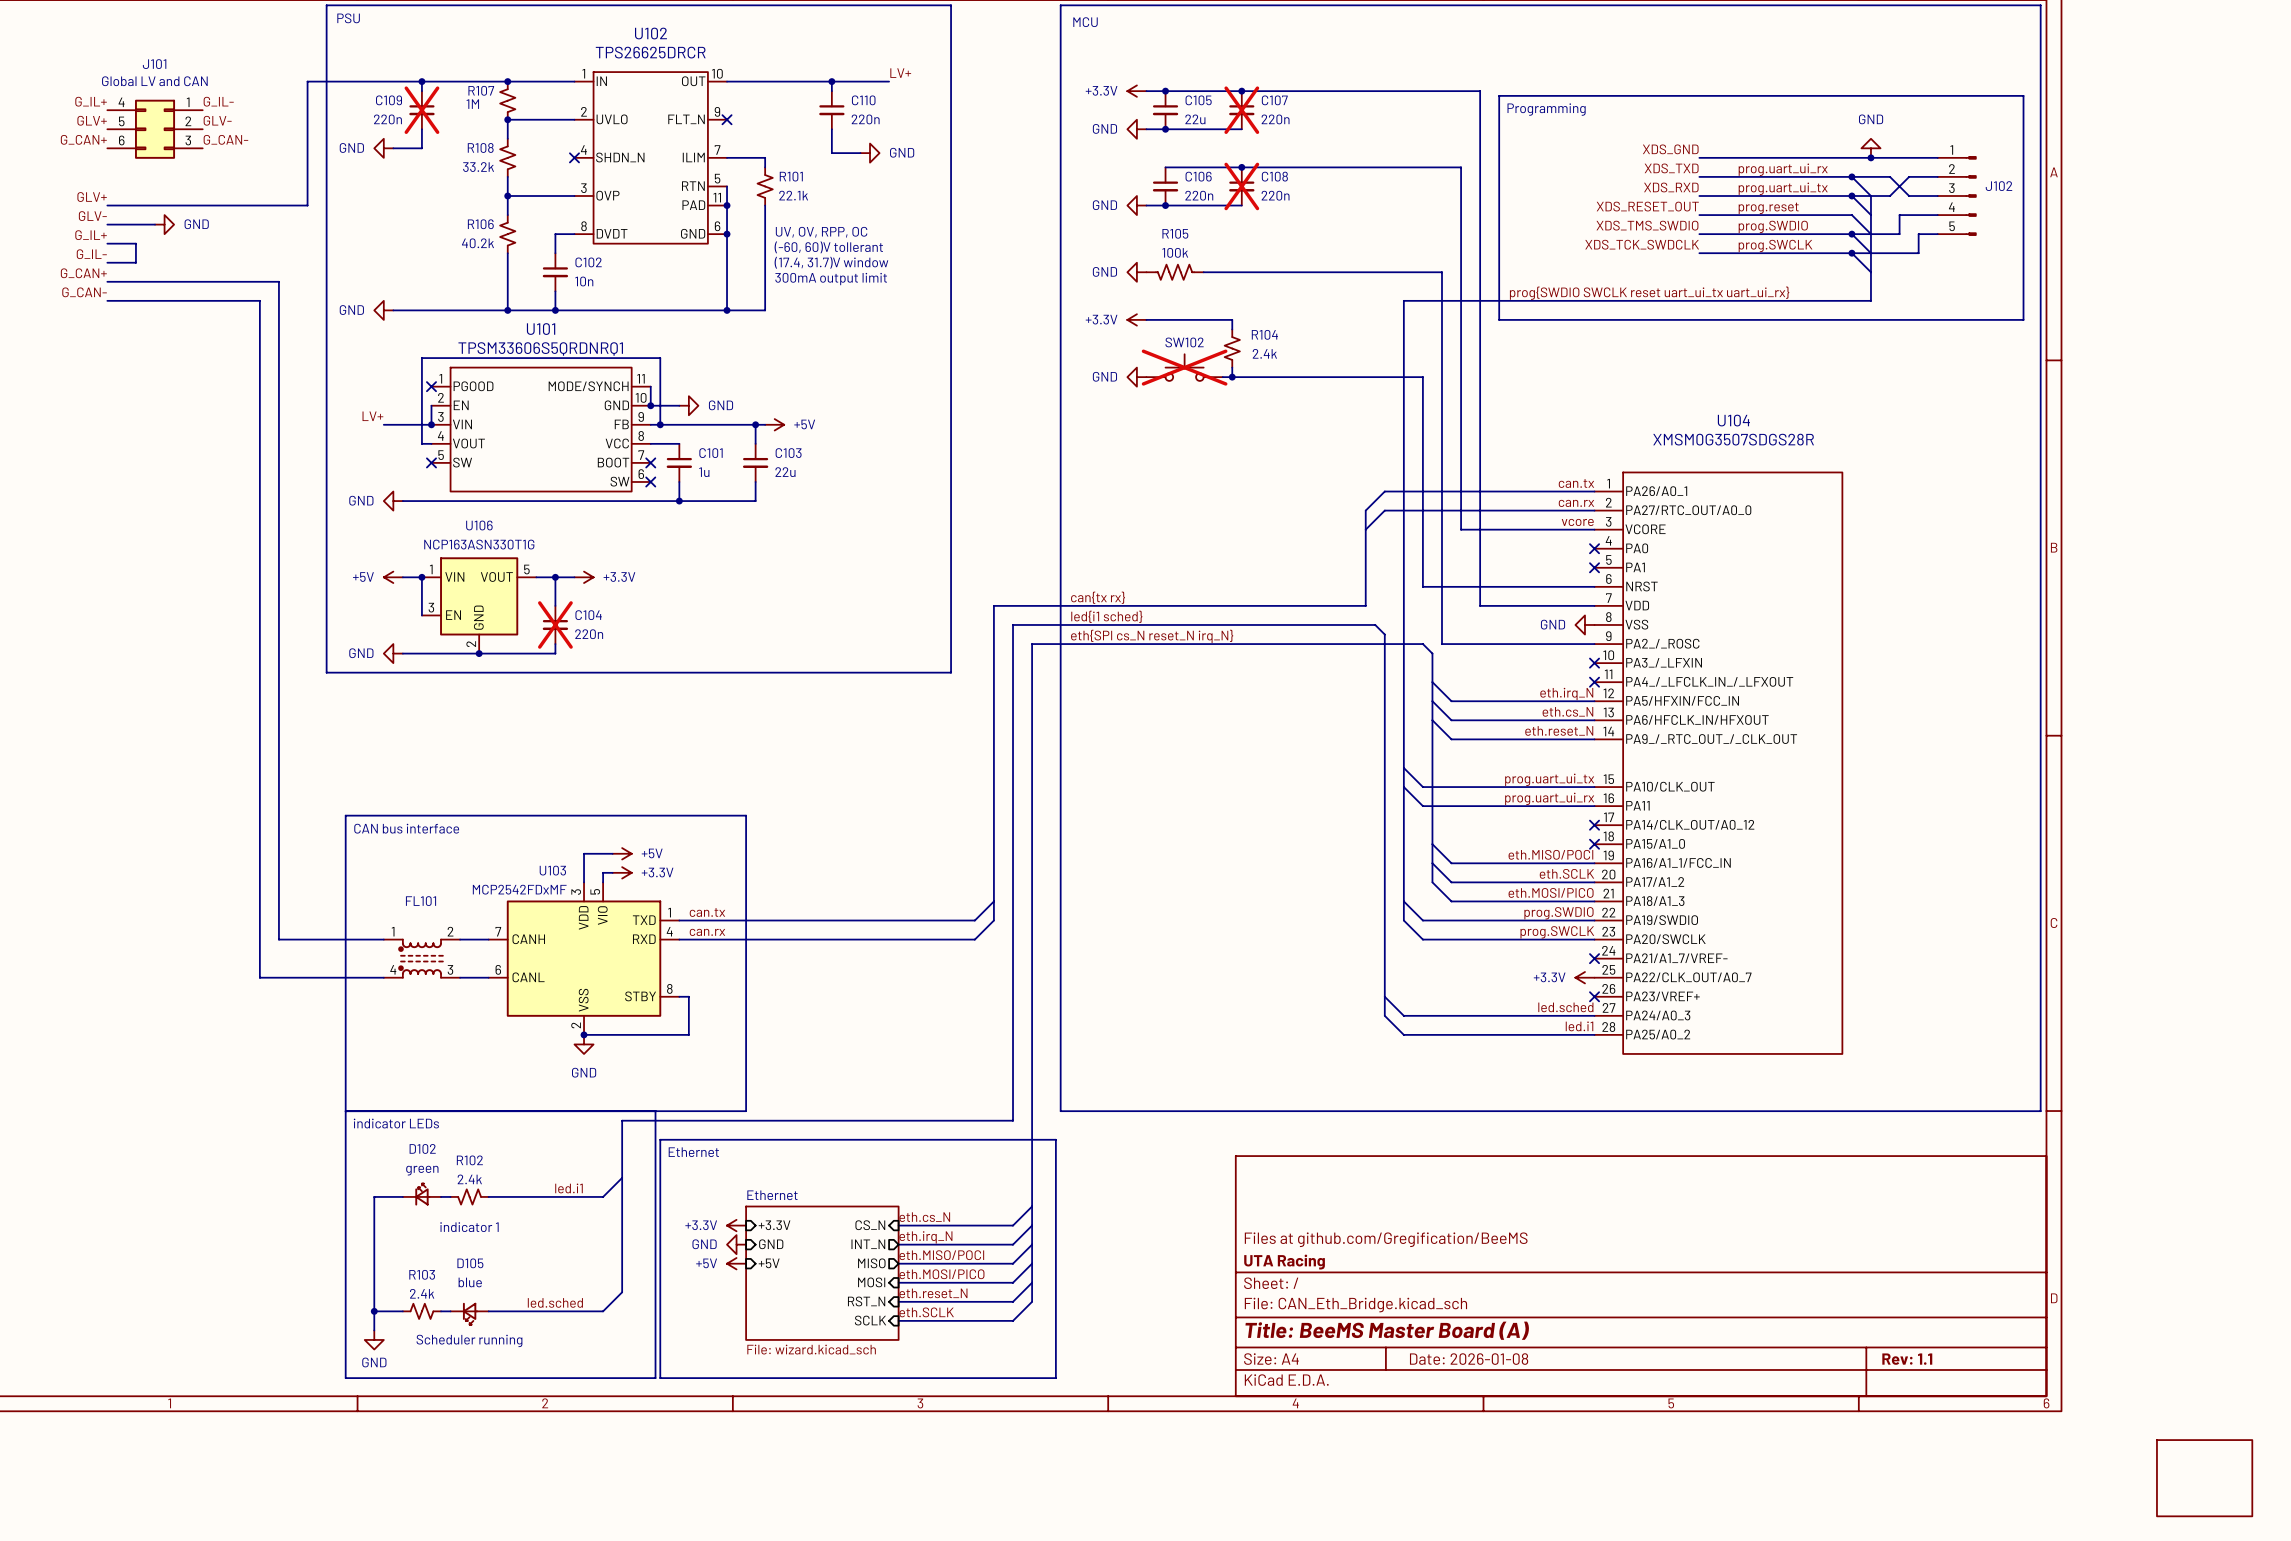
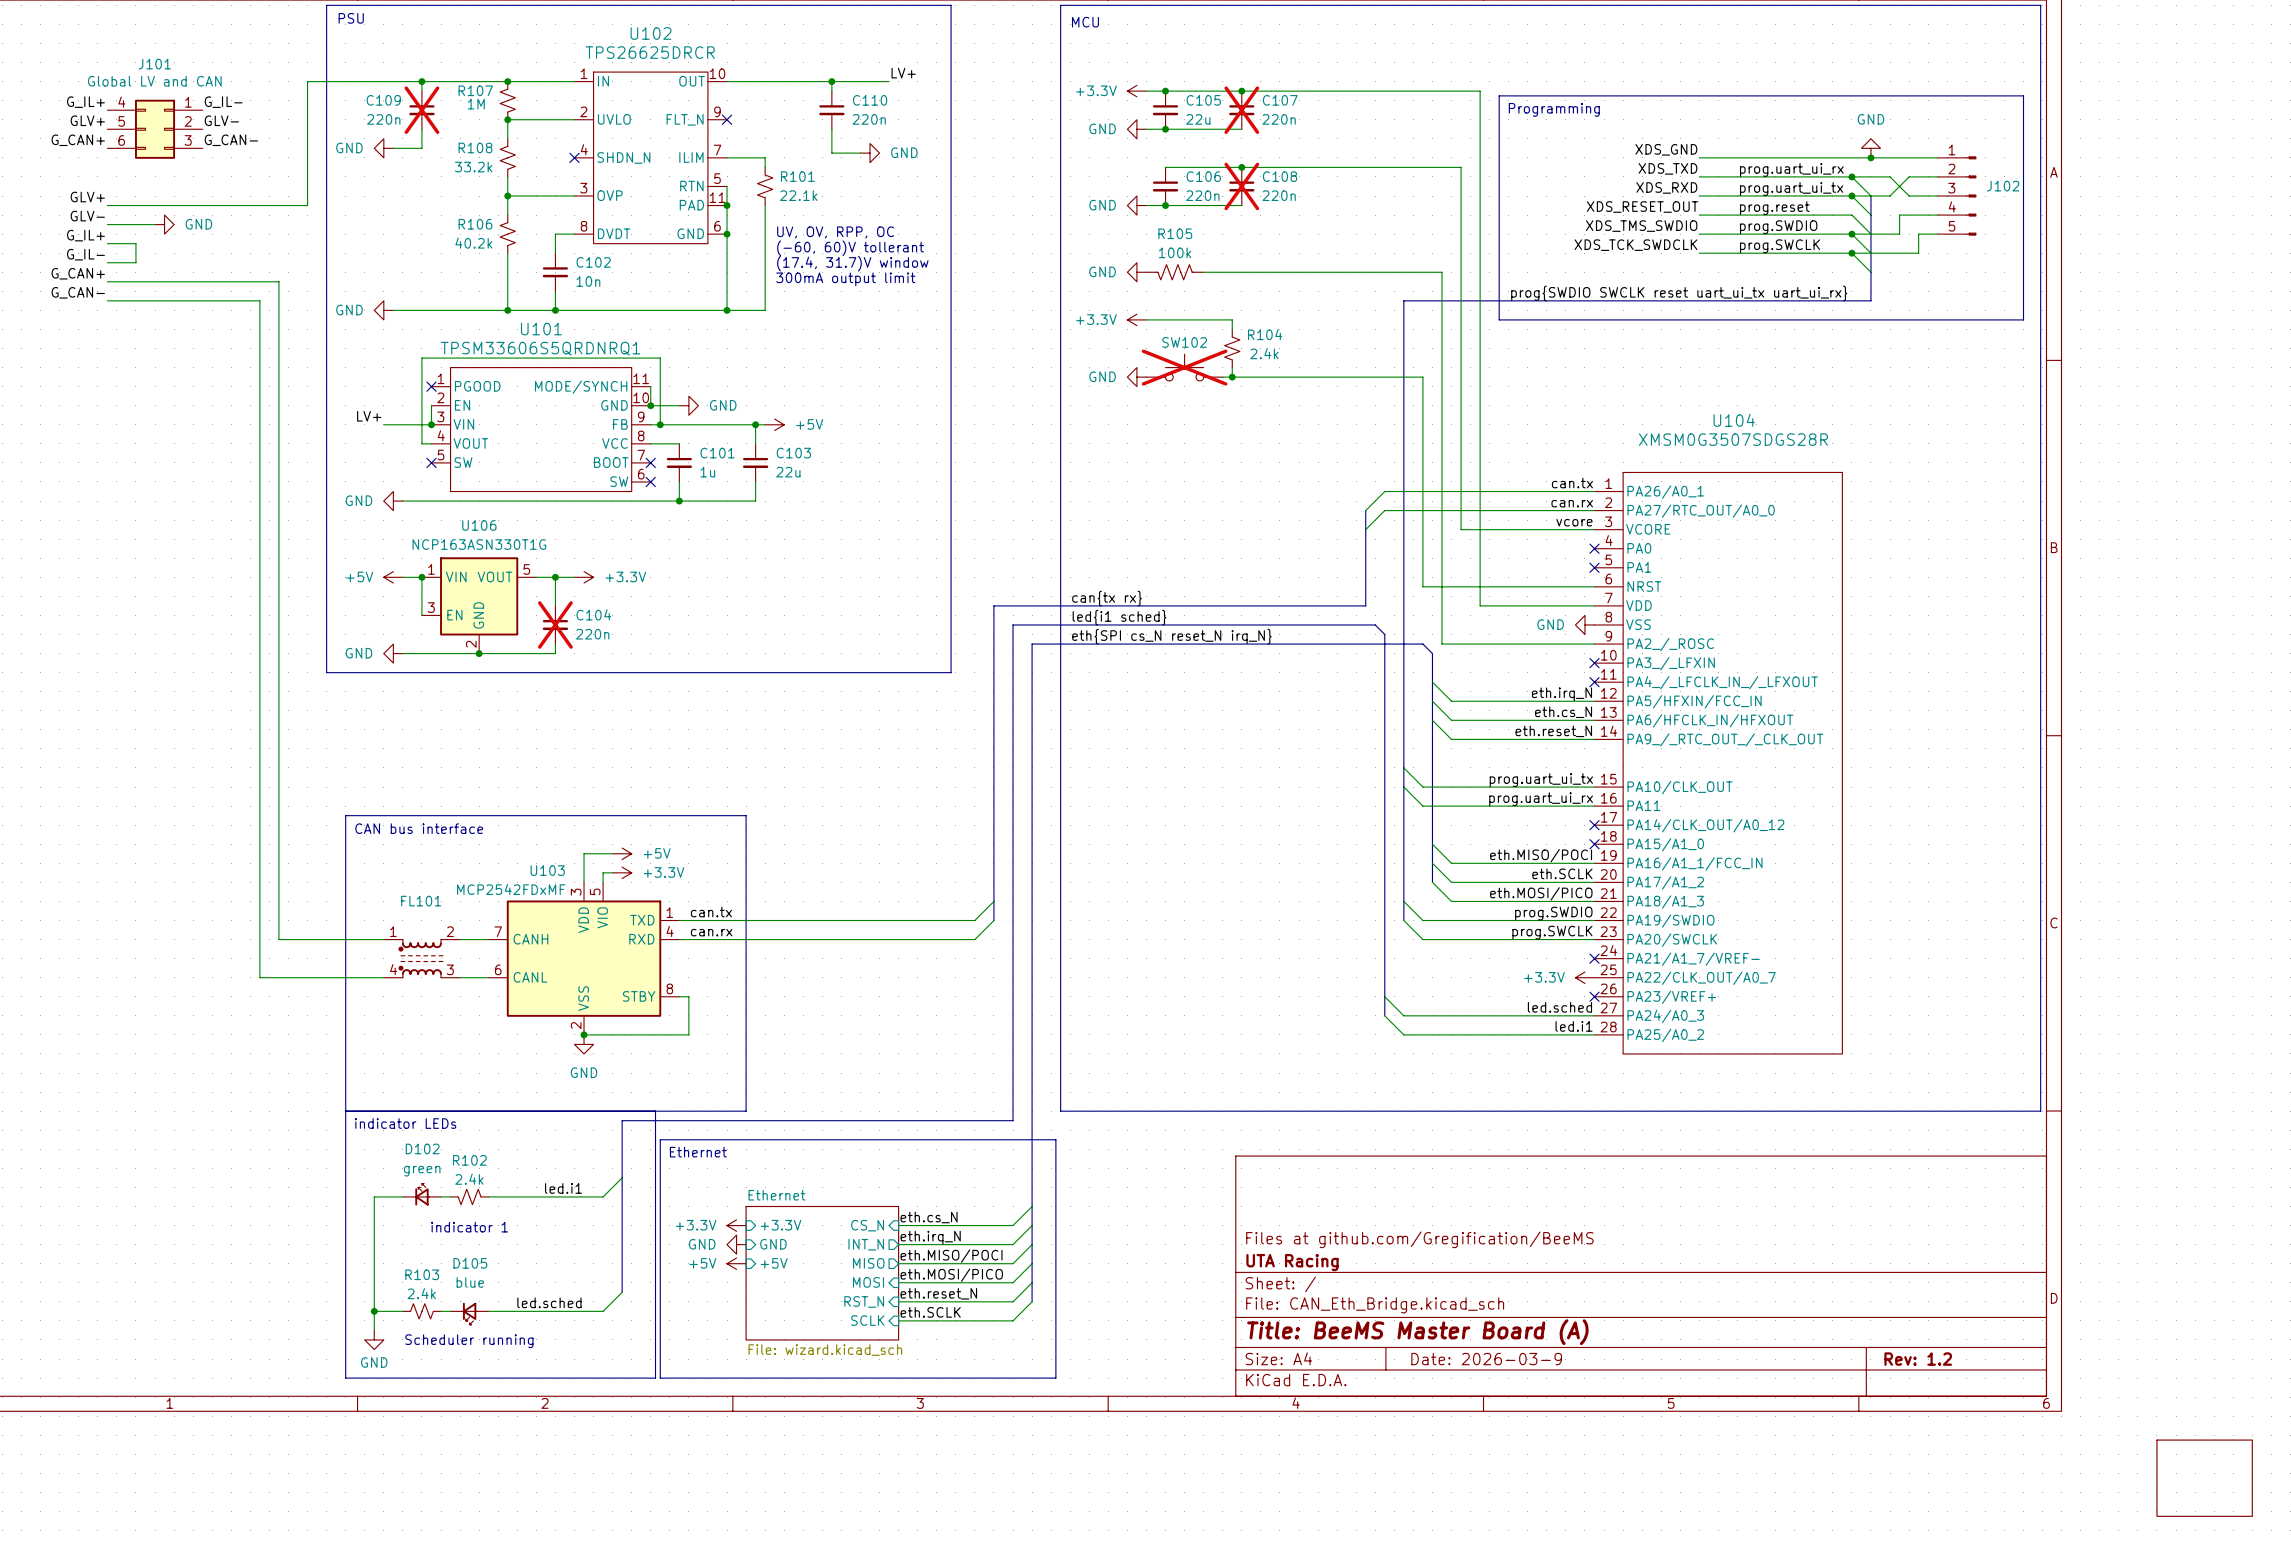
title block: Date: 2026-01-08 (1469, 1359) -> Date: 2026-03-9 (1486, 1359)
title block: Rev: 1.1 (1907, 1359) -> Rev: 1.2 (1918, 1359)

